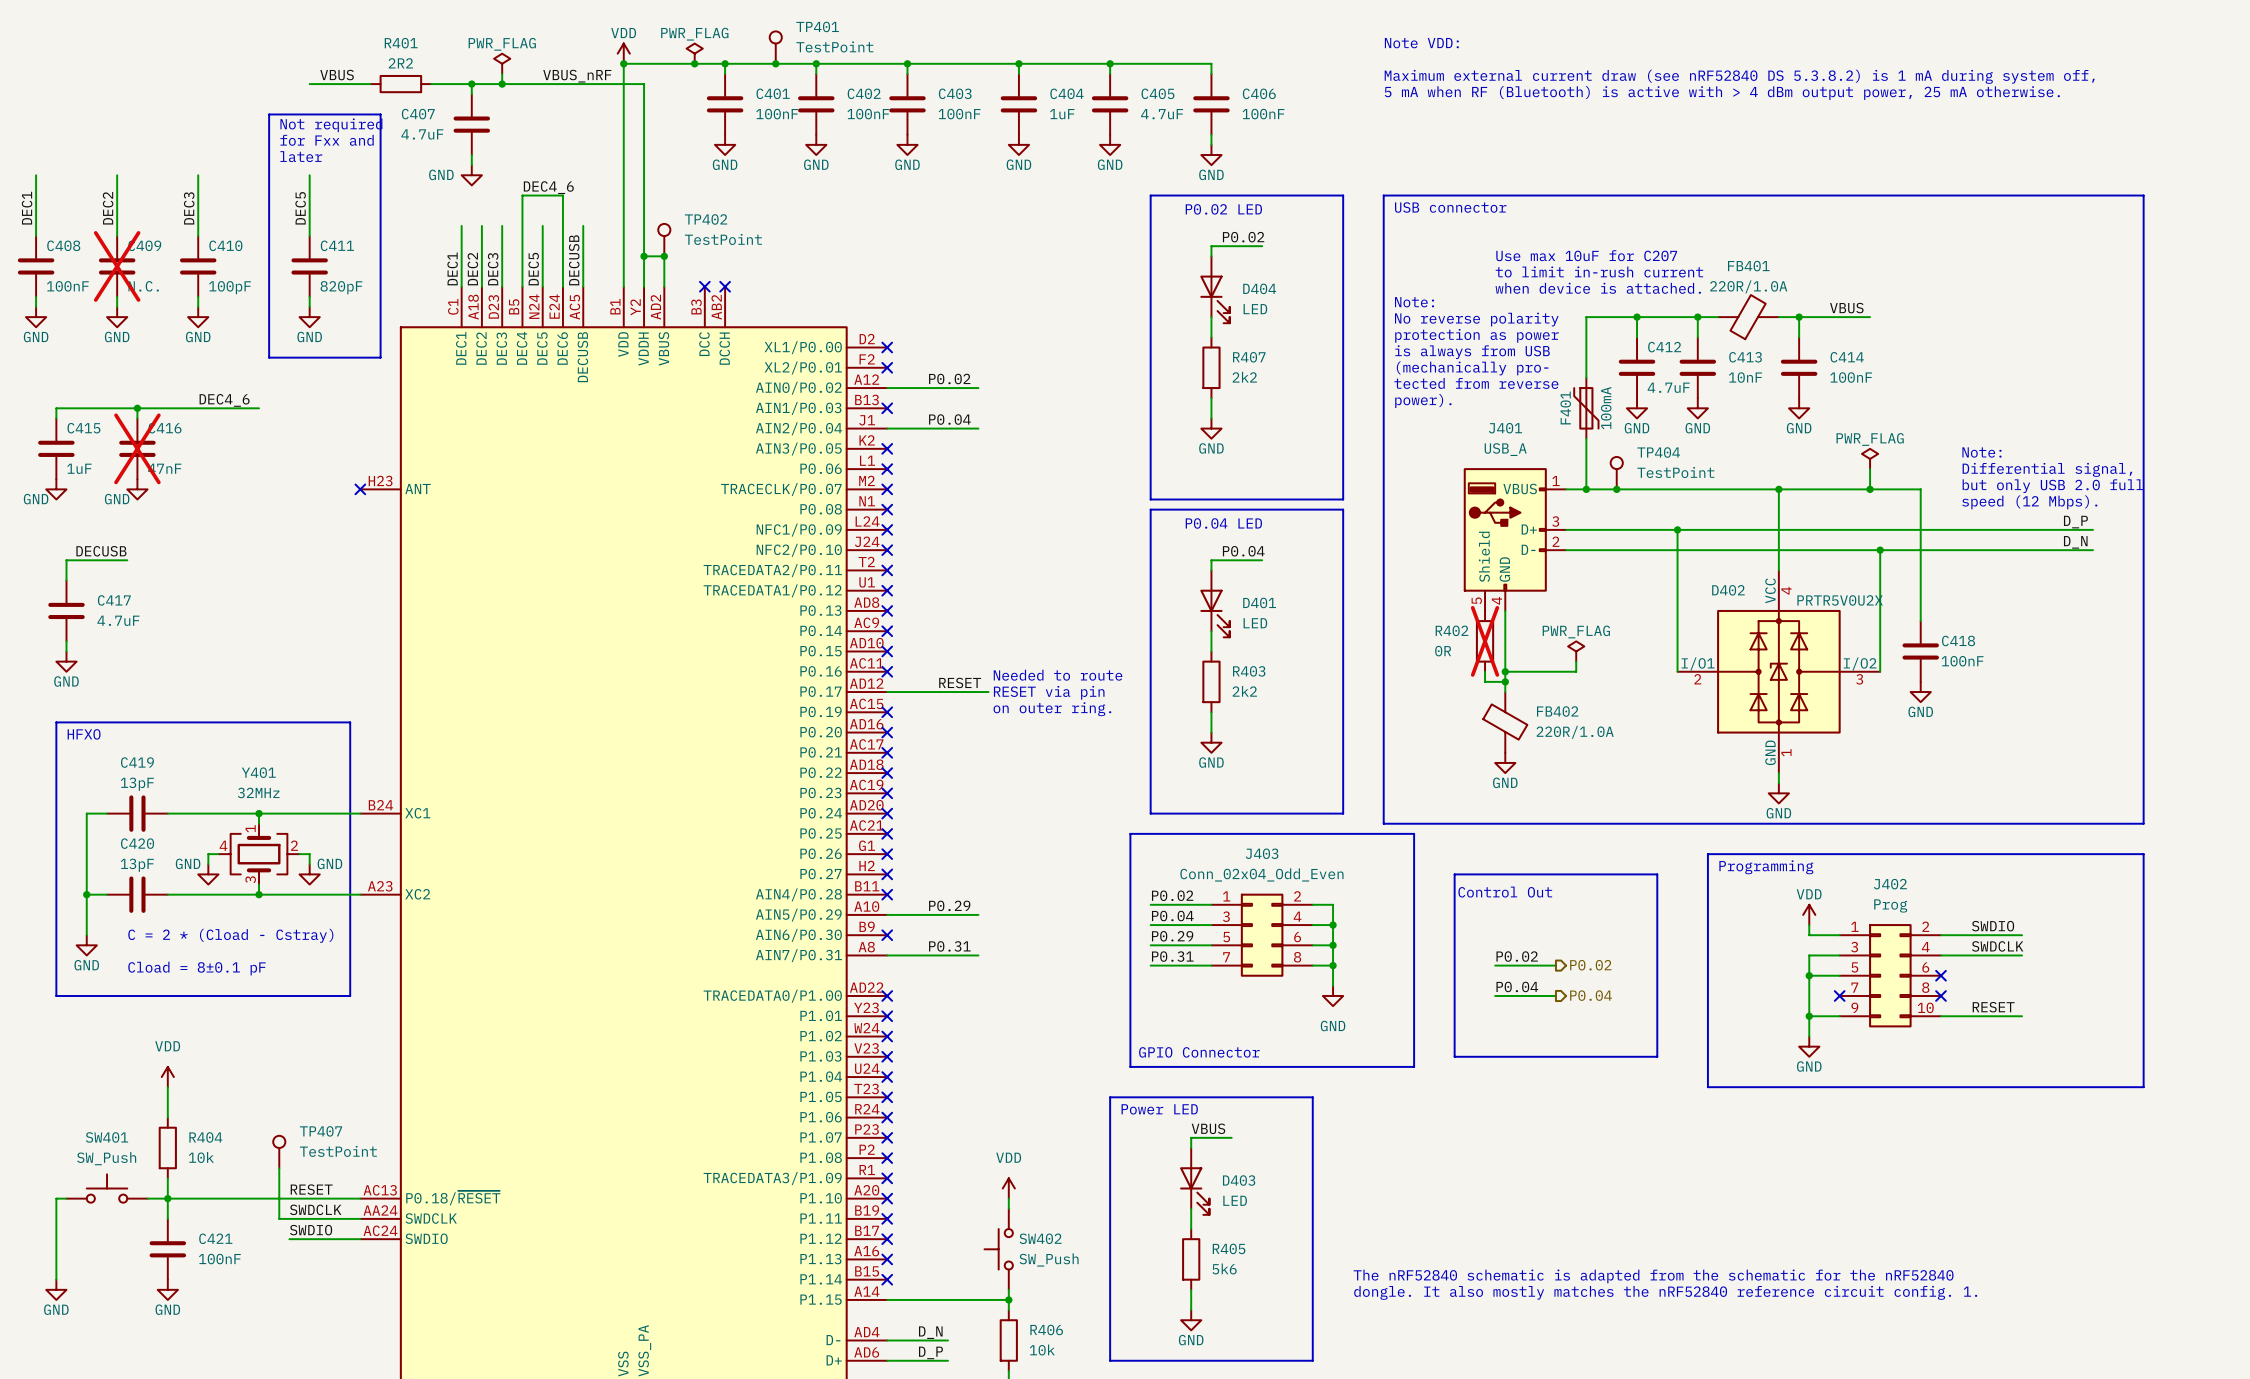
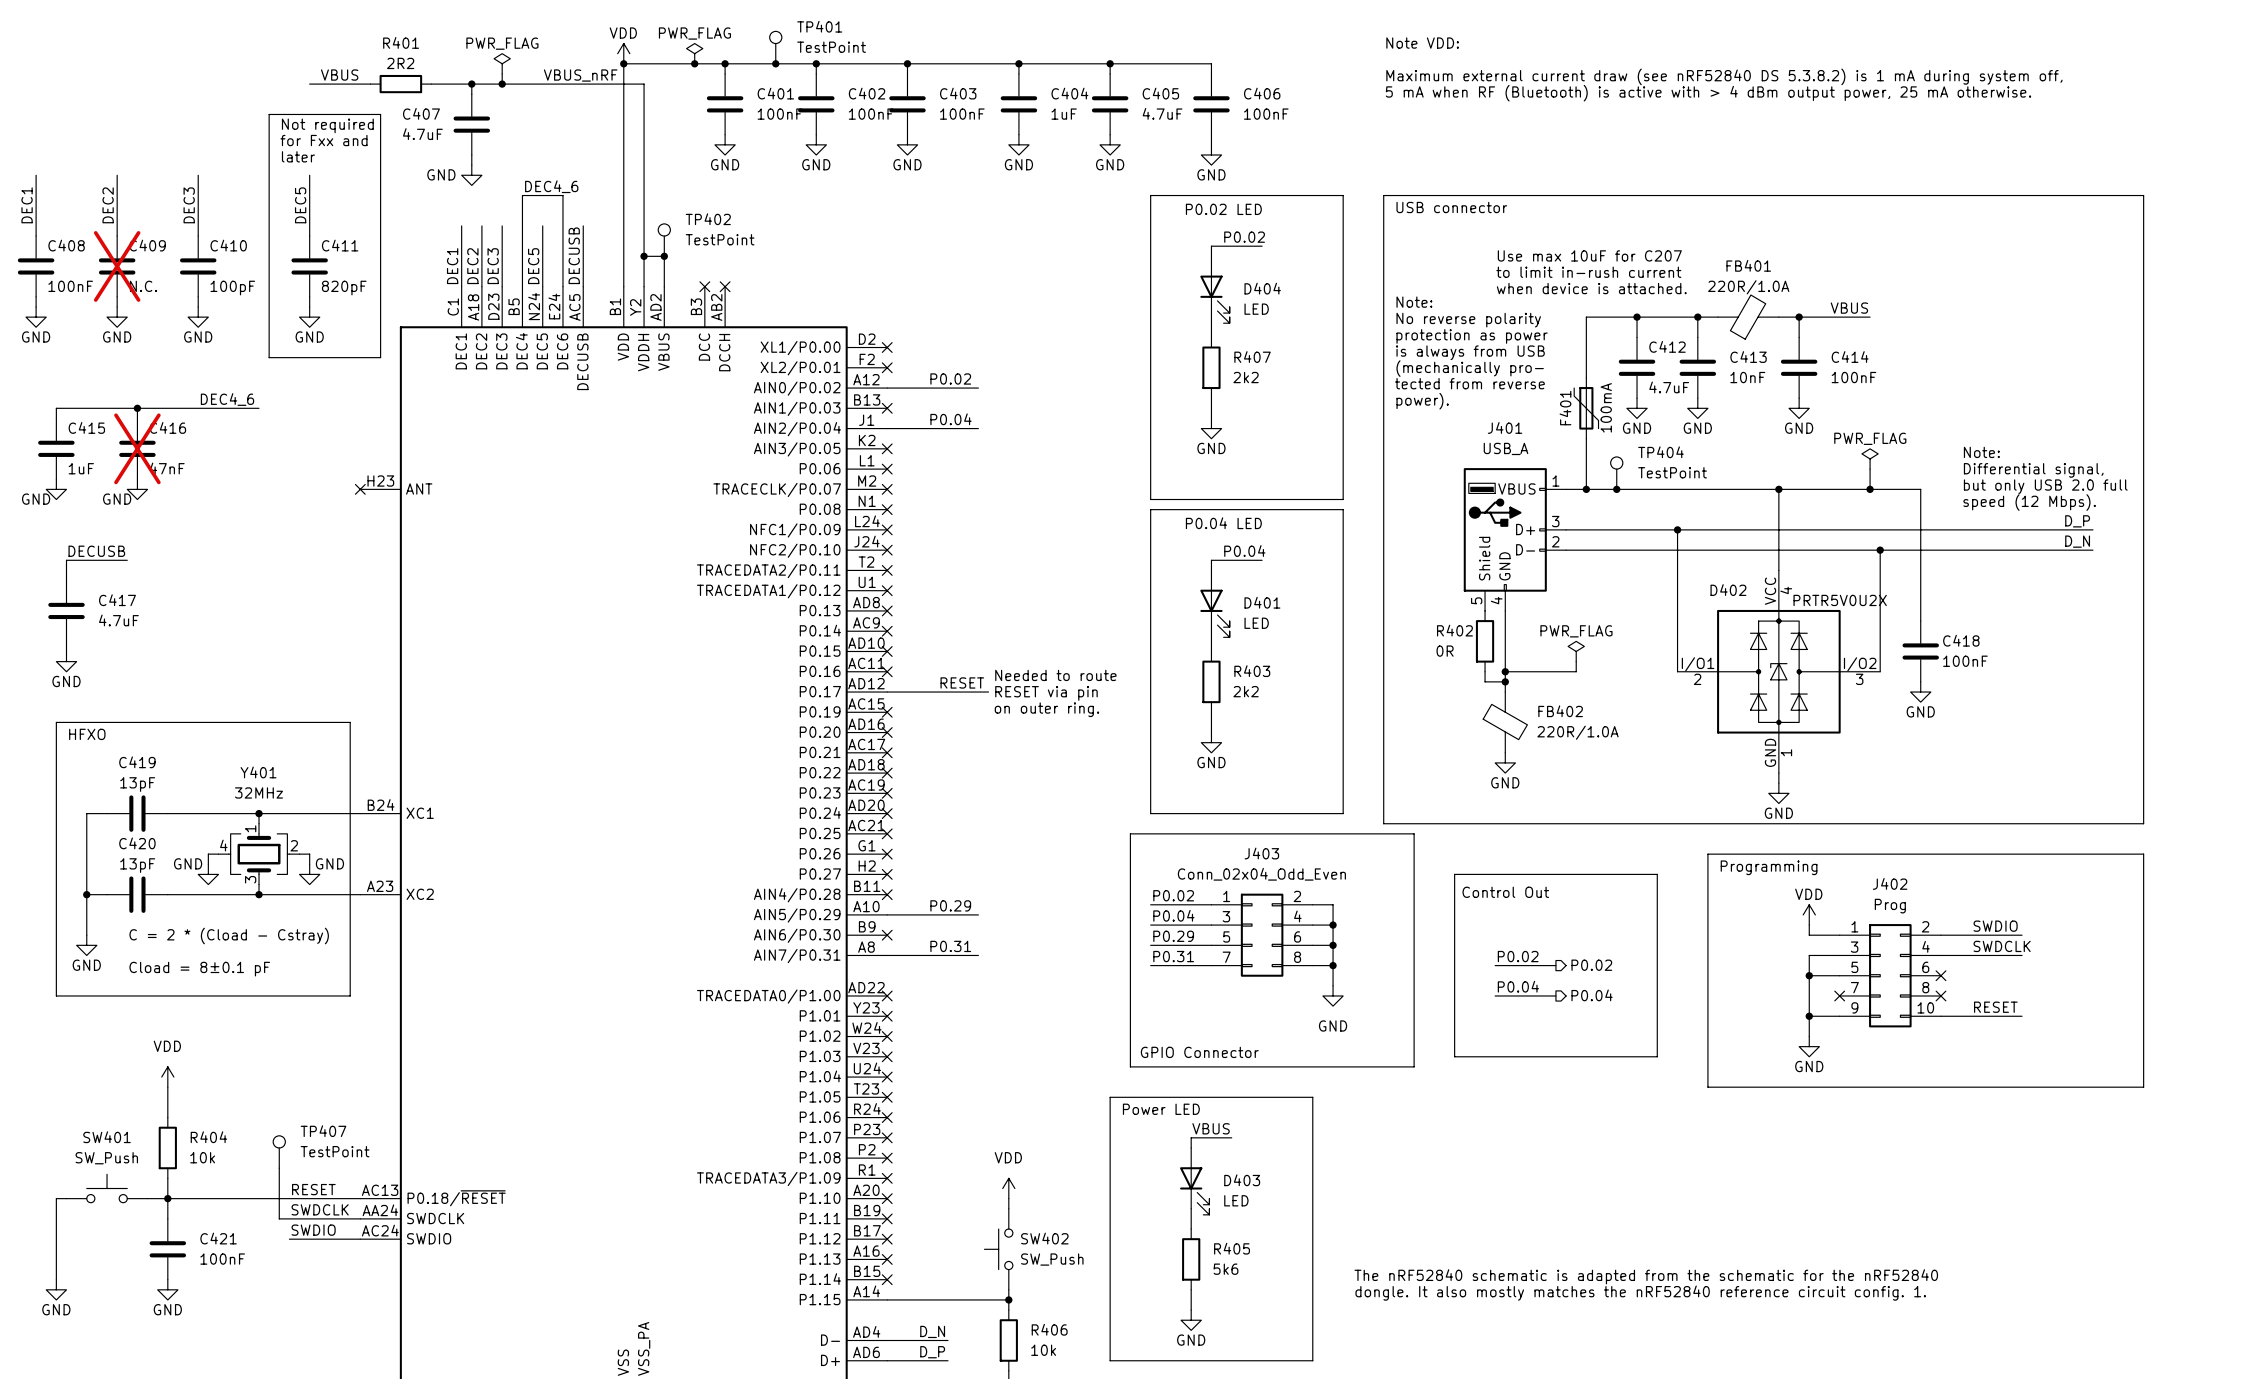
R402 do-not-place cross: (1485, 641) -> none

